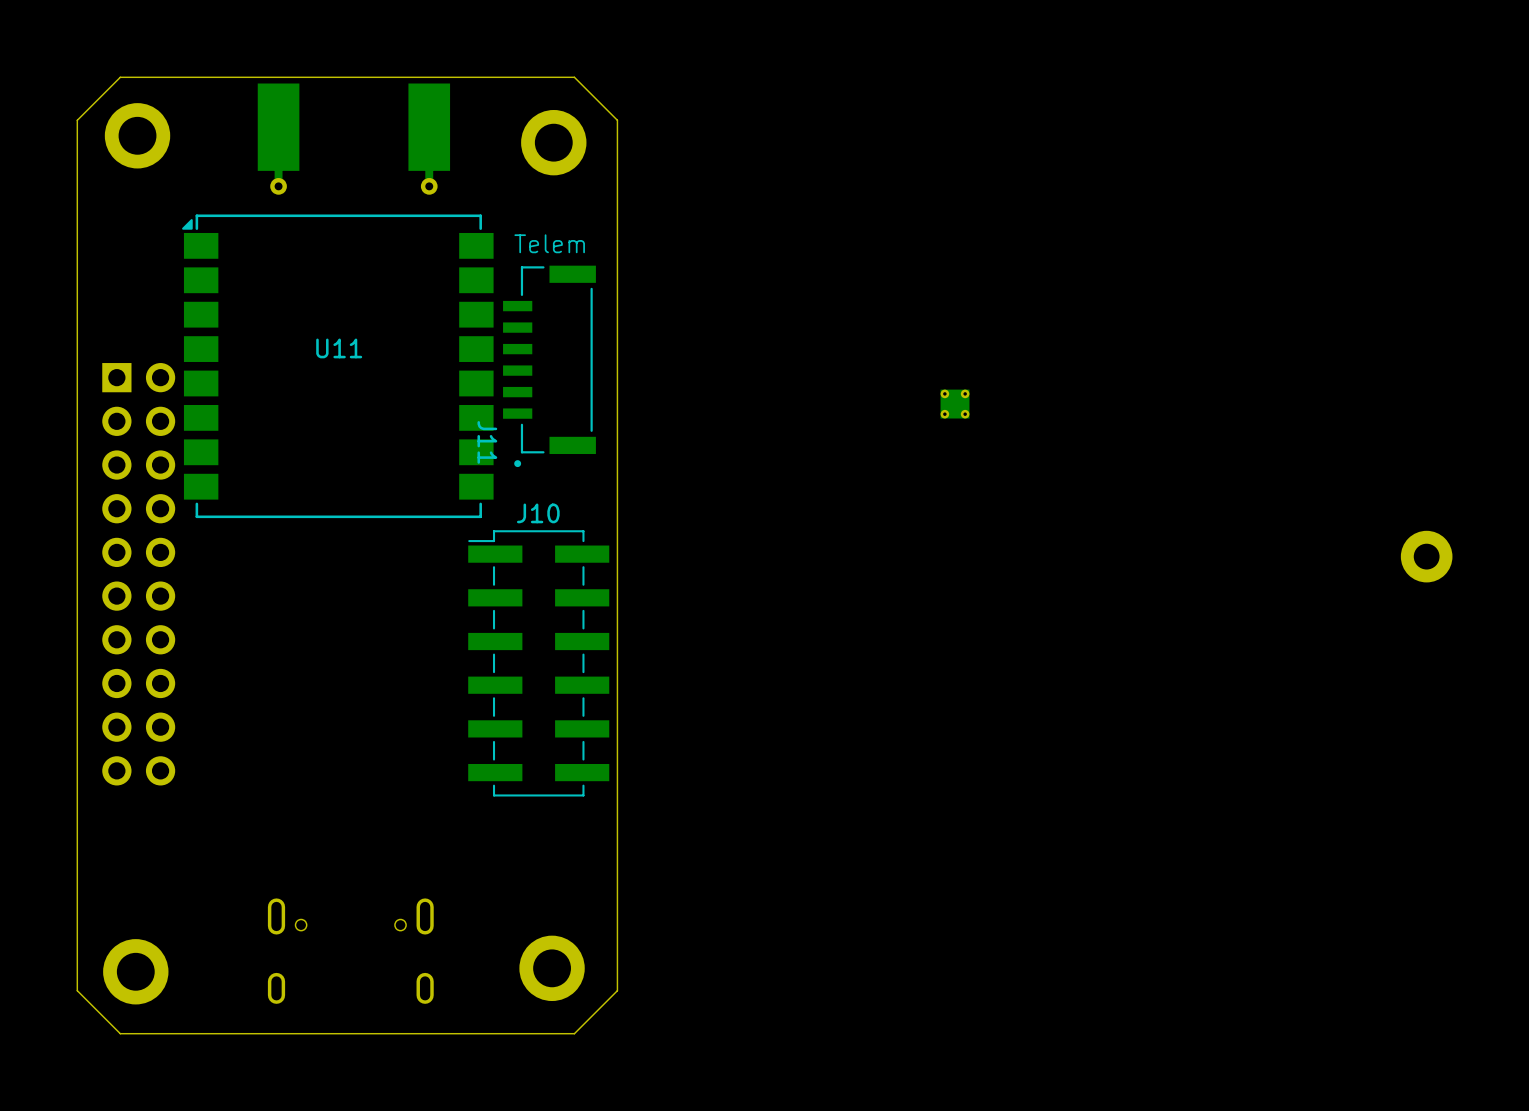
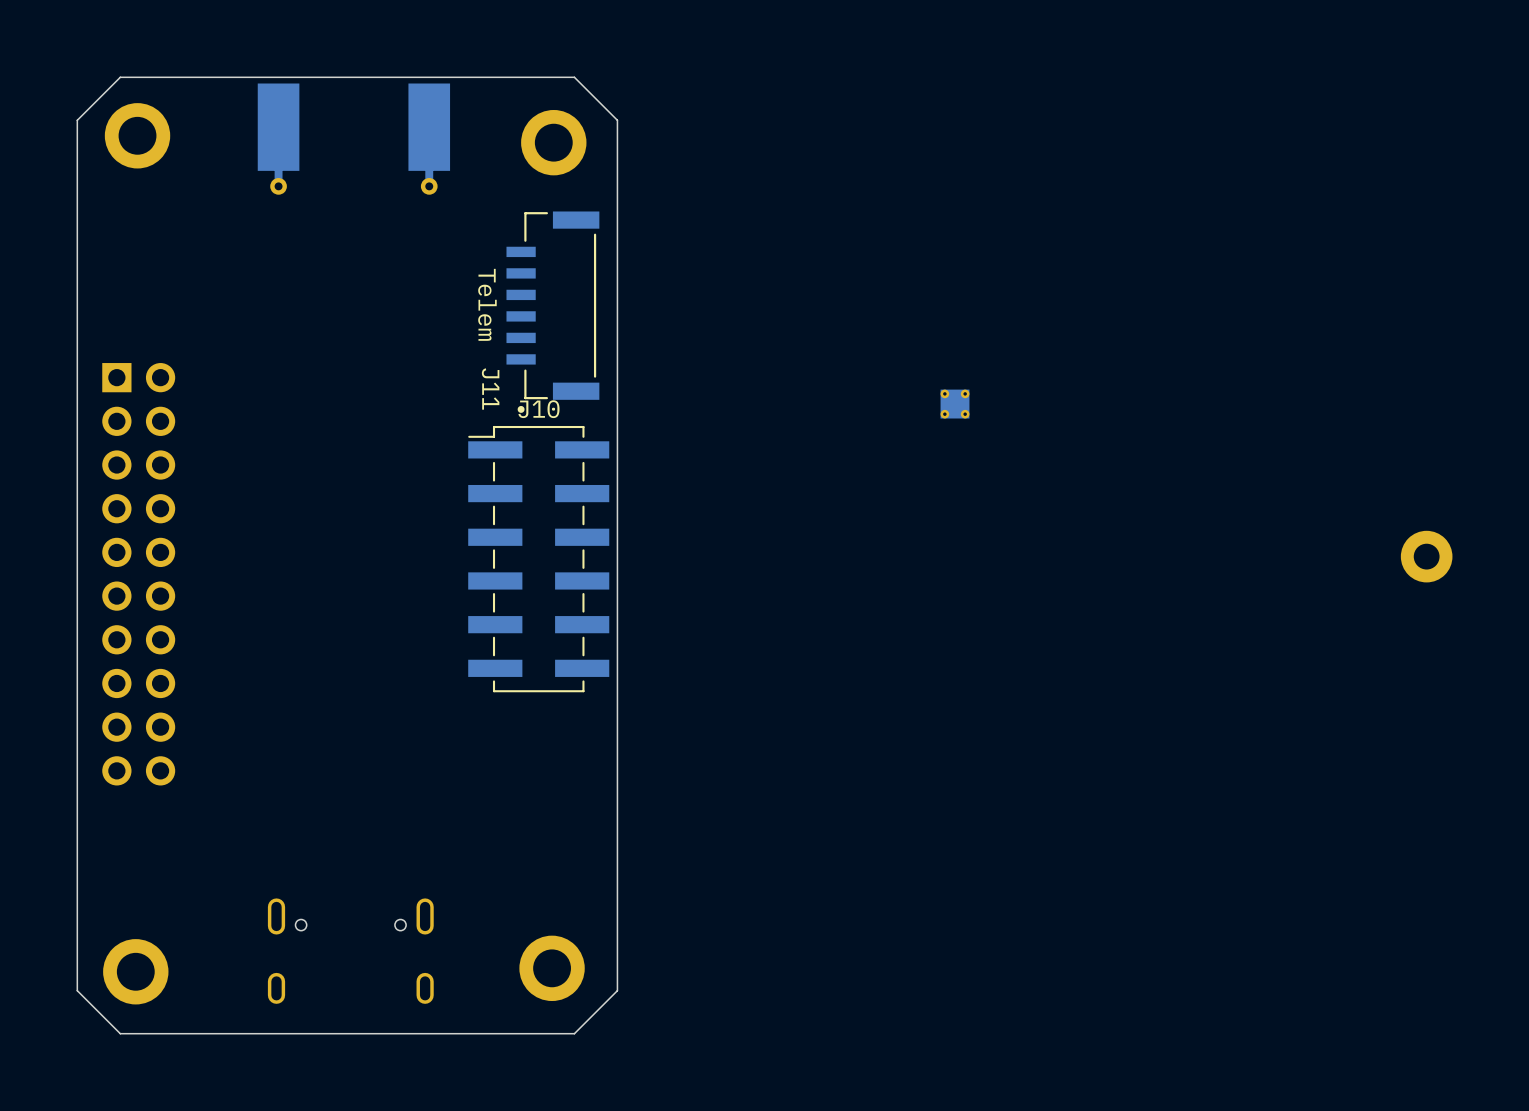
text rotation: 0° (549, 243) -> 90° clockwise (487, 304)
text position: Telem (549, 243) -> Telem (487, 304)
U11: (337, 366) -> none
J11 position: (549, 366) -> (552, 312)
J10 position: (538, 663) -> (538, 559)

